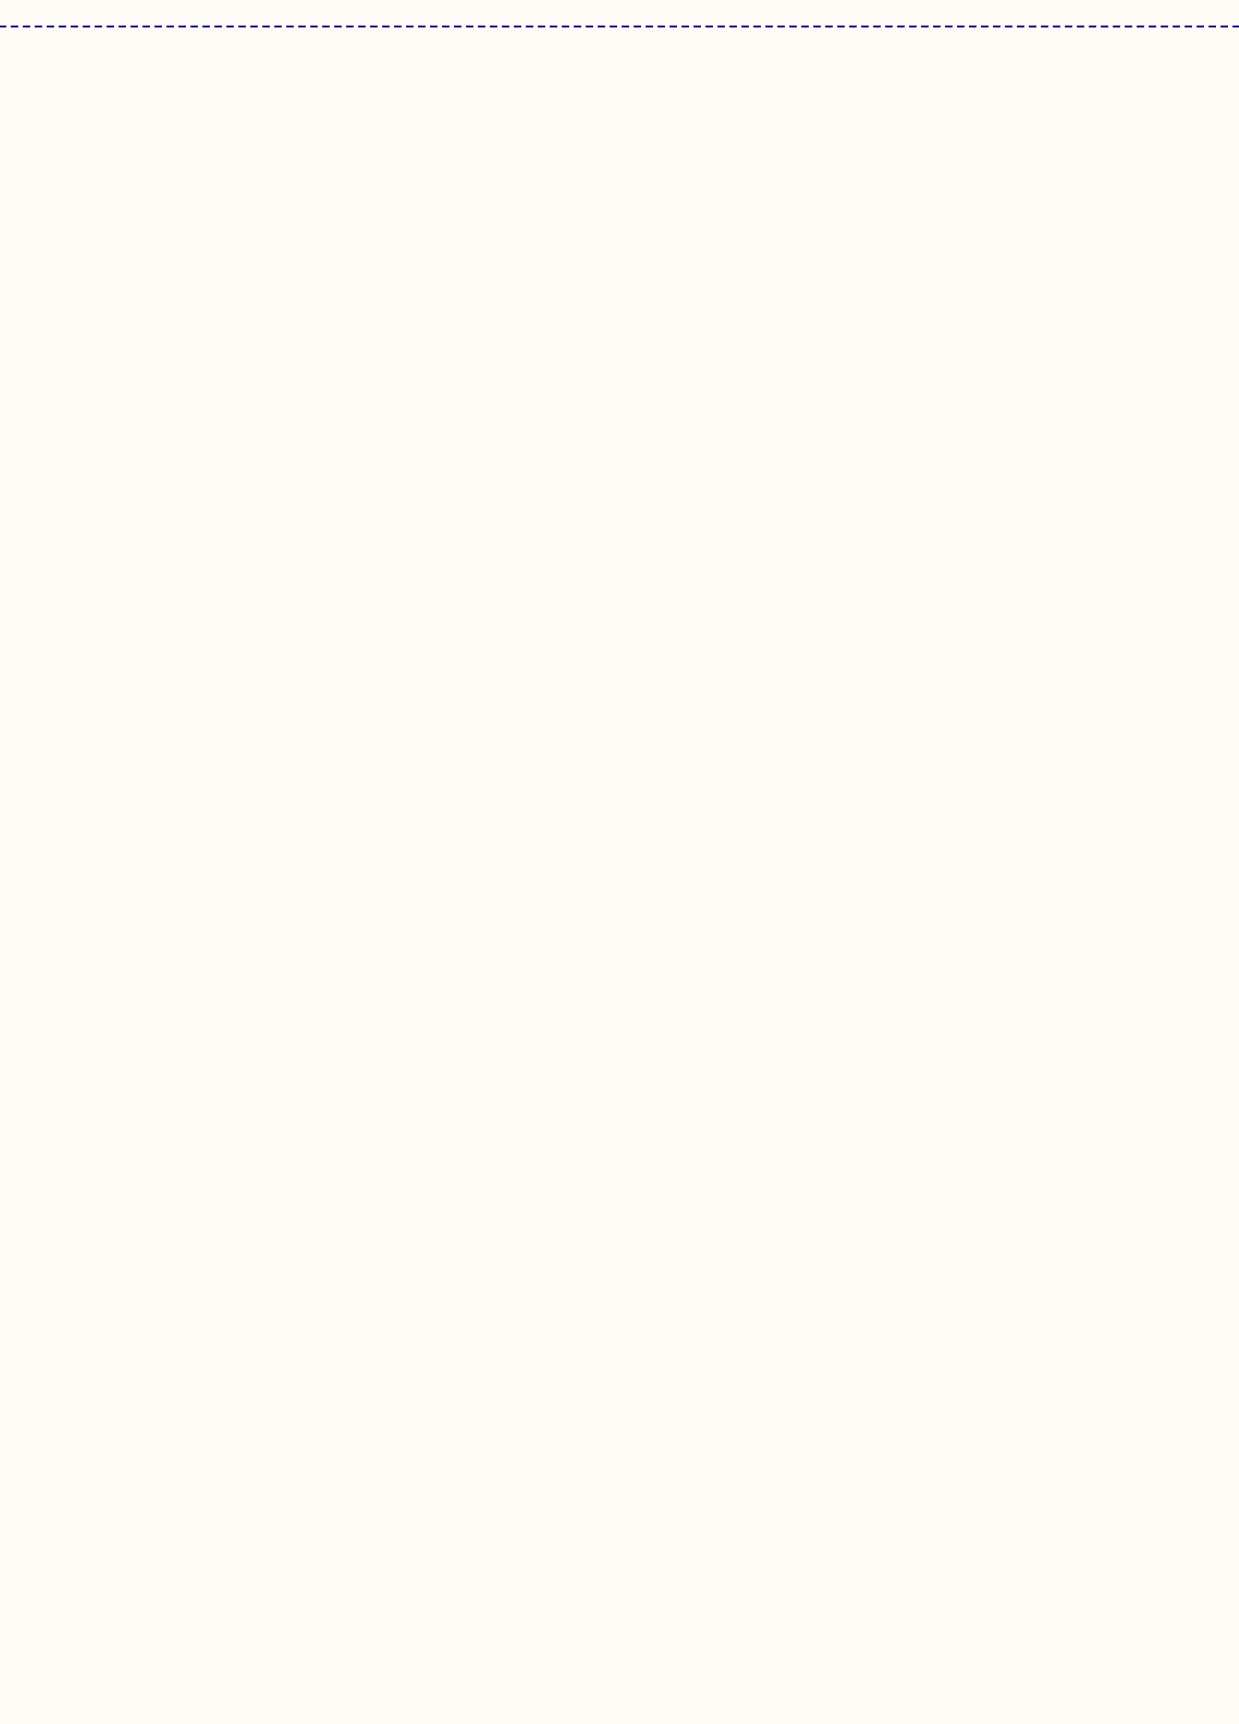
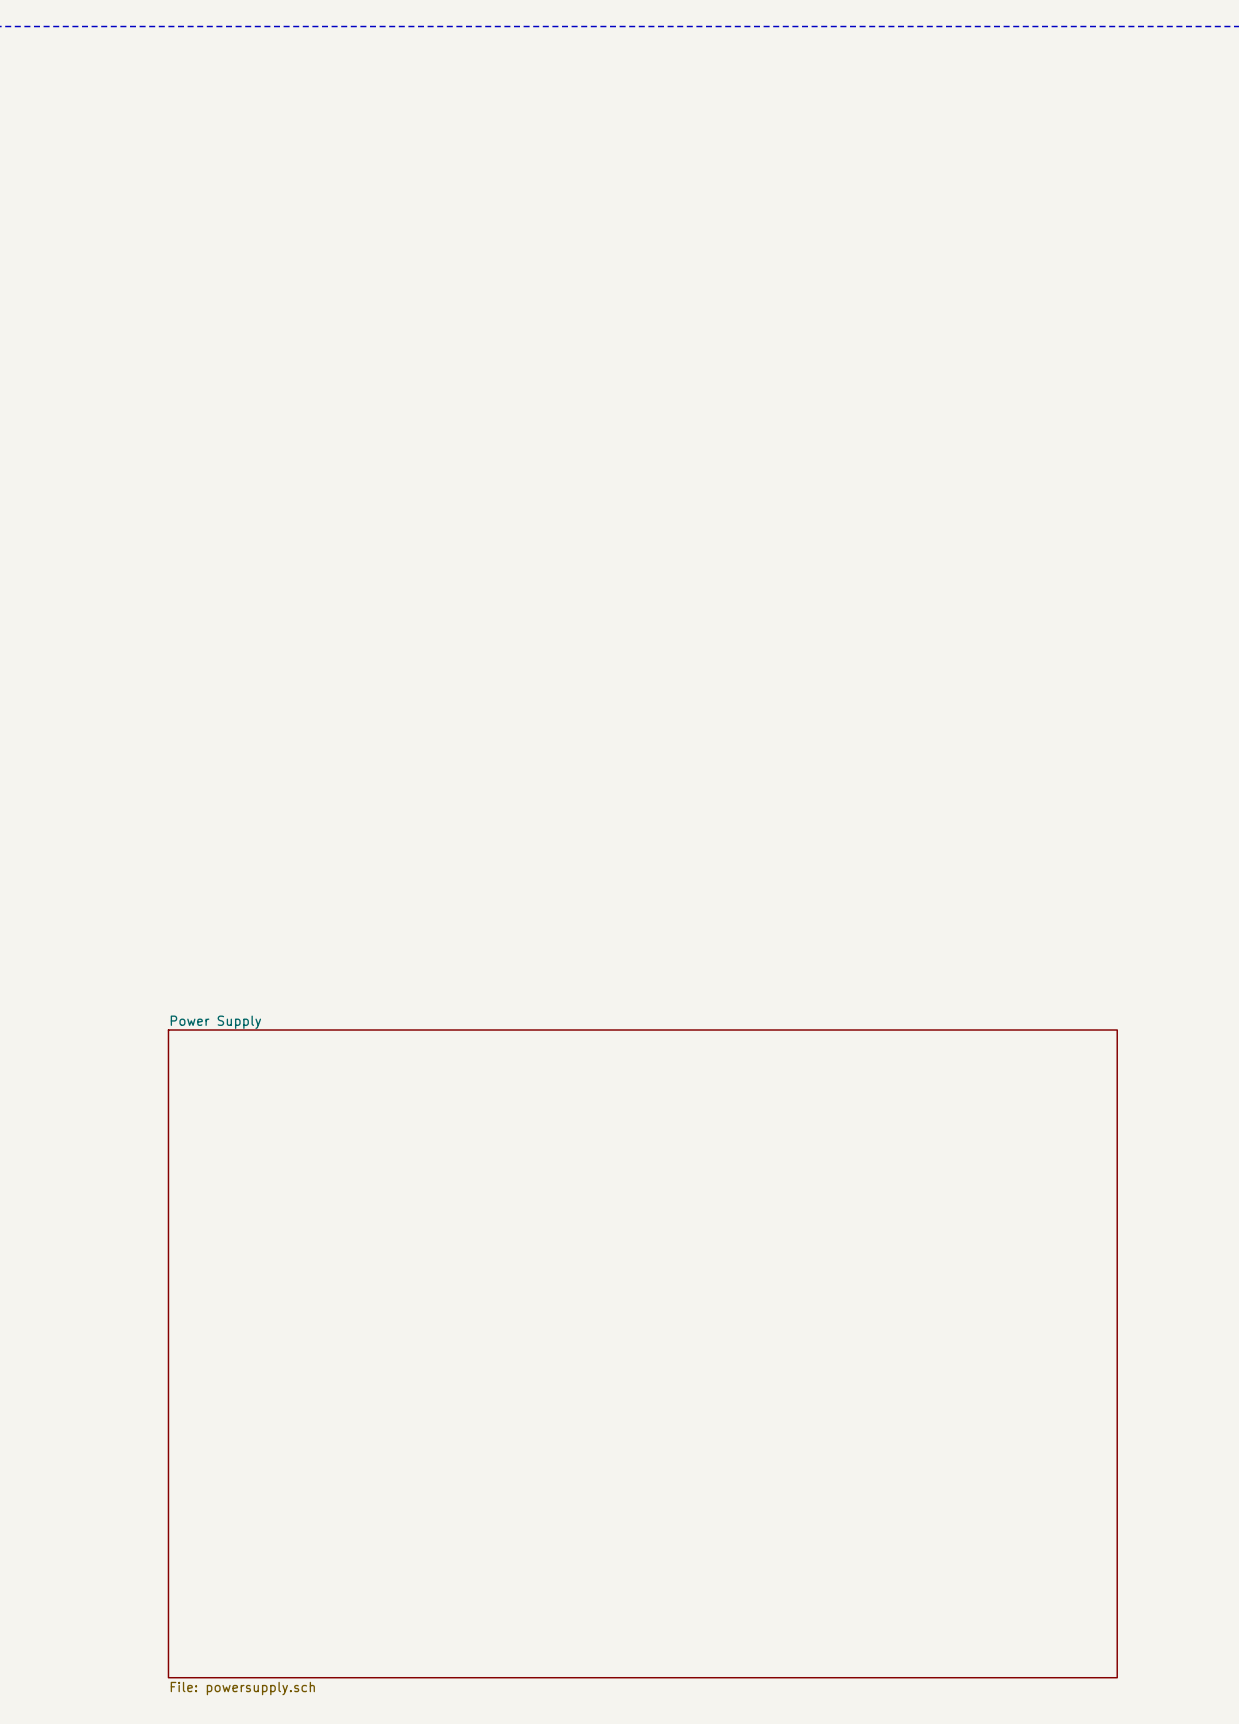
sheet Power Supply: none -> File: powersupply.sch (642, 1353)

